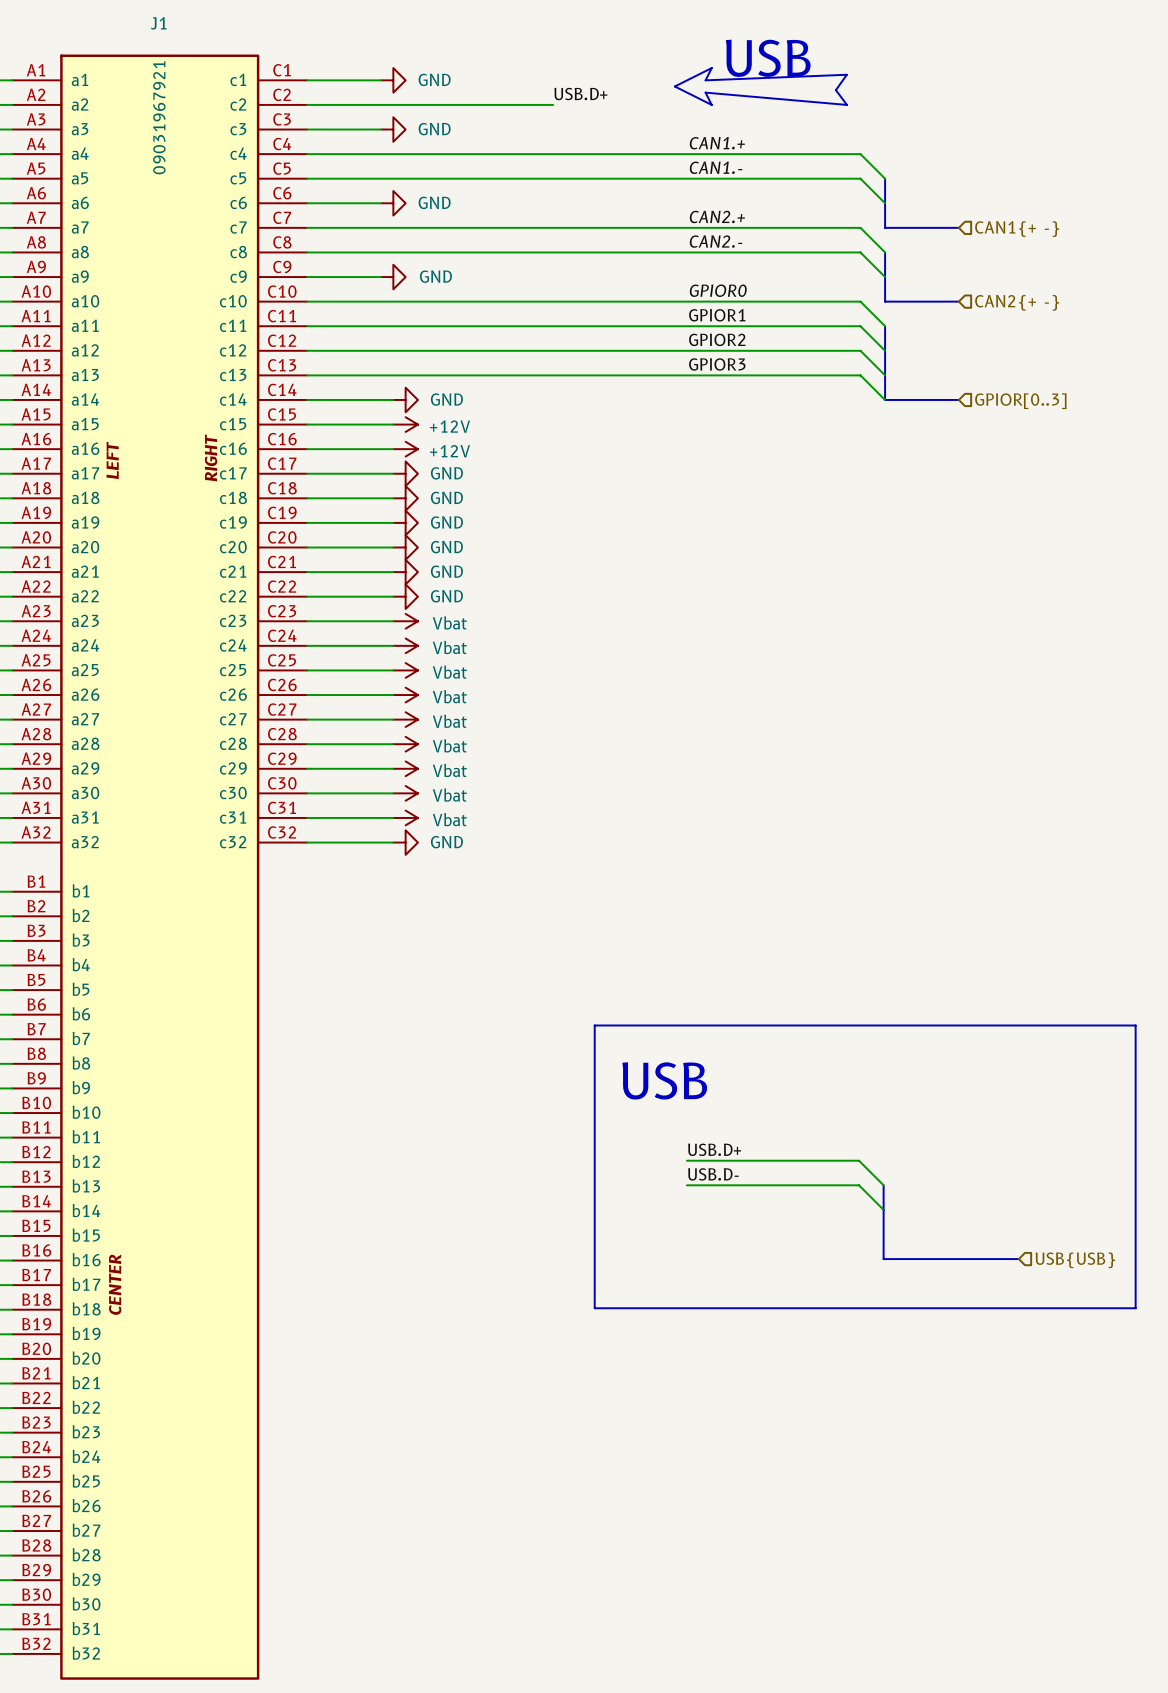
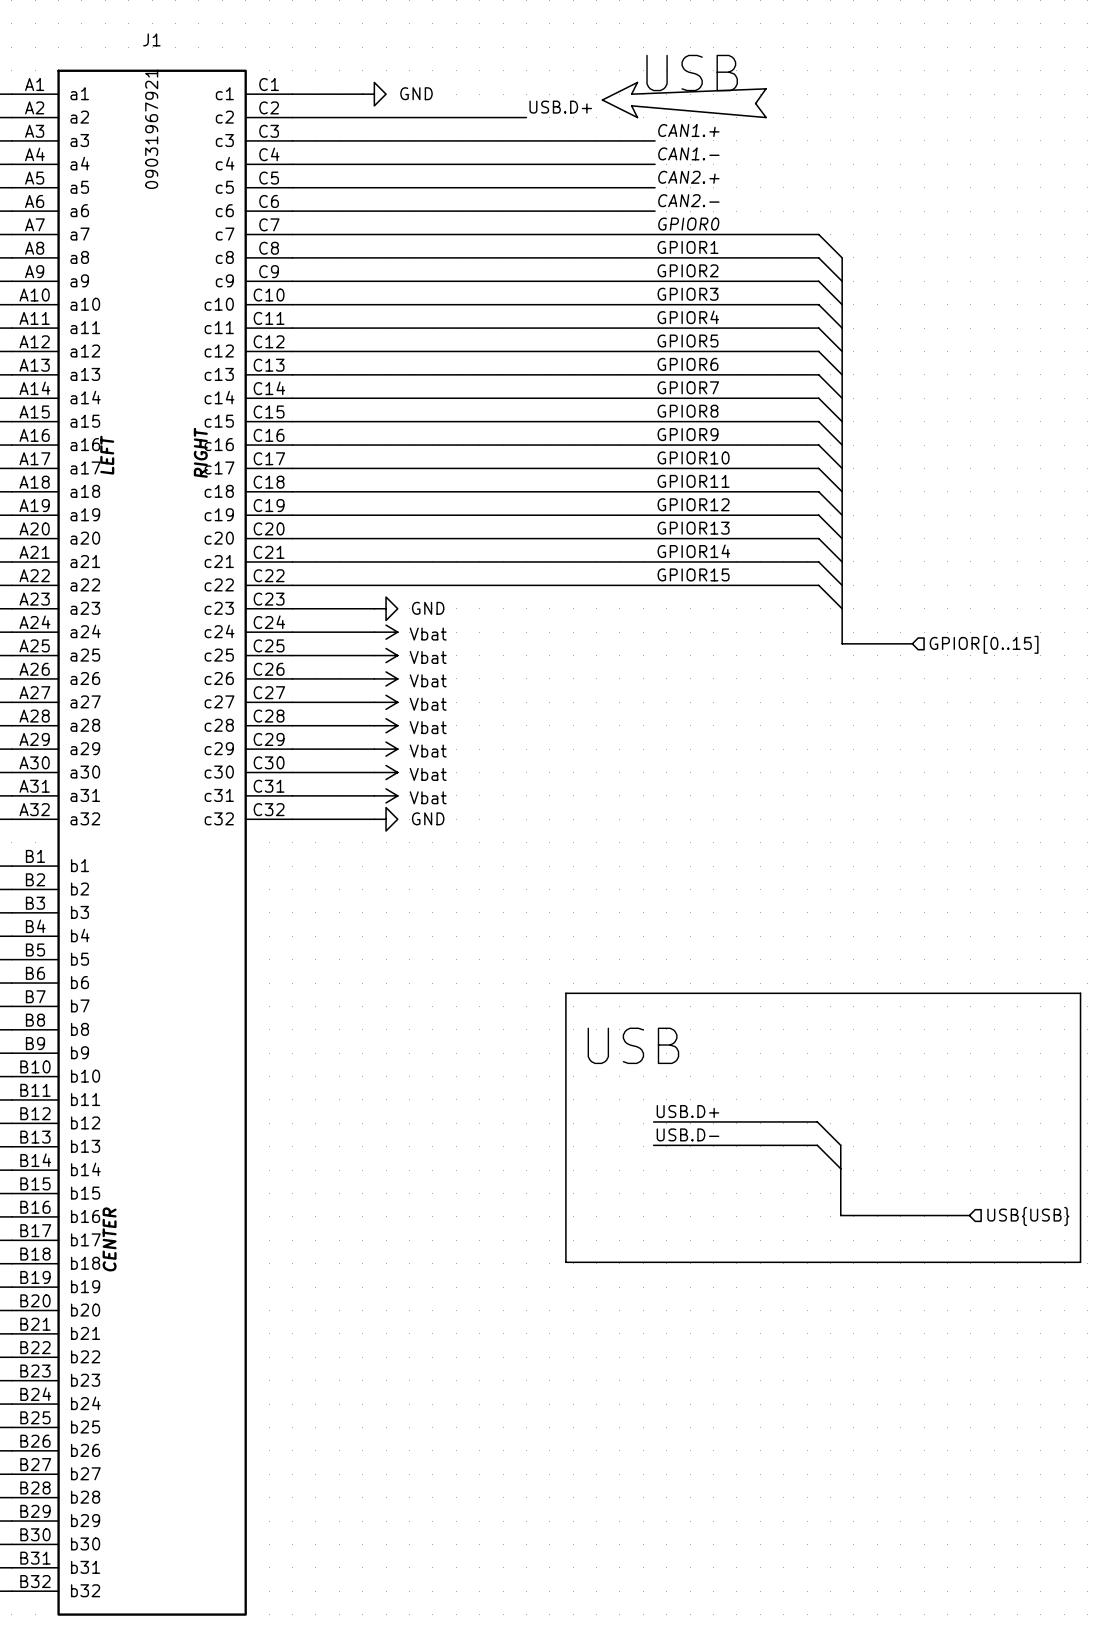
text position: USB (768, 58) -> USB (692, 73)
line: (711, 68) (705, 80) (846, 74) (835, 90) (846, 104) (705, 92) (711, 104) (674, 86) (711, 68) -> (637, 82) (631, 94) (765, 88) (755, 103) (766, 117) (631, 105) (637, 117) (602, 100) (637, 82)
label: none -> CAN1.+ (688, 130)
wire: none -> (362, 140) (655, 140)
power symbol: GND (393, 129) -> none
label: CAN1.+ (717, 143) -> CAN1.- (688, 153)
wire: (688, 154) (860, 154) (885, 178) -> none
label: CAN1.- (716, 167) -> CAN2.+ (688, 177)
wire: (688, 178) (860, 178) (885, 203) -> none
bus: (885, 178) (885, 227) (958, 227) -> none
label: none -> CAN2.- (688, 200)
wire: none -> (362, 211) (655, 211)
power symbol: GND (393, 203) -> none
label: CAN2.+ (717, 216) -> GPIOR0 (688, 224)
hierarchical label: CAN1{+ -} (1017, 229) -> none
label: CAN2.- (716, 241) -> GPIOR1 (687, 247)
label: none -> GPIOR2 (687, 270)
wire: none -> (362, 281) (818, 281) (842, 304)
power symbol: GND (393, 277) -> none
label: GPIOR0 (718, 290) -> GPIOR3 (687, 294)
bus: (885, 301) (958, 301) -> (842, 304) (842, 328)
hierarchical label: CAN2{+ -} (1017, 302) -> none
label: GPIOR1 (717, 315) -> GPIOR4 (688, 317)
label: GPIOR2 (717, 339) -> GPIOR5 (687, 341)
label: GPIOR3 (717, 364) -> GPIOR6 (687, 364)
label: none -> GPIOR7 (688, 387)
wire: none -> (374, 398) (818, 398) (842, 421)
power symbol: GND (405, 399) -> none
bus: (885, 399) (958, 399) -> (842, 398) (842, 643) (912, 643)
hierarchical label: GPIOR[0..3] (1020, 401) -> none
label: none -> GPIOR8 (687, 411)
wire: none -> (374, 421) (818, 421) (842, 445)
power symbol: +12V (405, 424) -> none
label: none -> GPIOR9 (687, 434)
wire: none -> (374, 445) (818, 445) (842, 468)
power symbol: +12V (405, 449) -> none
label: none -> GPIOR10 (693, 457)
wire: none -> (374, 468) (818, 468) (842, 491)
power symbol: GND (405, 473) -> none
label: none -> GPIOR11 (693, 481)
wire: none -> (374, 491) (818, 491) (842, 515)
power symbol: GND (405, 498) -> none
label: none -> GPIOR12 (693, 504)
wire: none -> (374, 515) (818, 515) (842, 538)
power symbol: GND (405, 522) -> none
label: none -> GPIOR13 (693, 528)
wire: none -> (374, 538) (818, 538) (842, 561)
power symbol: GND (405, 547) -> none
label: none -> GPIOR14 (693, 551)
wire: none -> (374, 561) (818, 561) (842, 585)
power symbol: GND (405, 572) -> none
label: none -> GPIOR15 (693, 574)
wire: none -> (374, 585) (818, 585) (842, 608)
power symbol: GND (405, 596) -> none
power symbol: Vbat (405, 621) -> GND (386, 608)
hierarchical label: none -> GPIOR[0..15] (984, 644)

